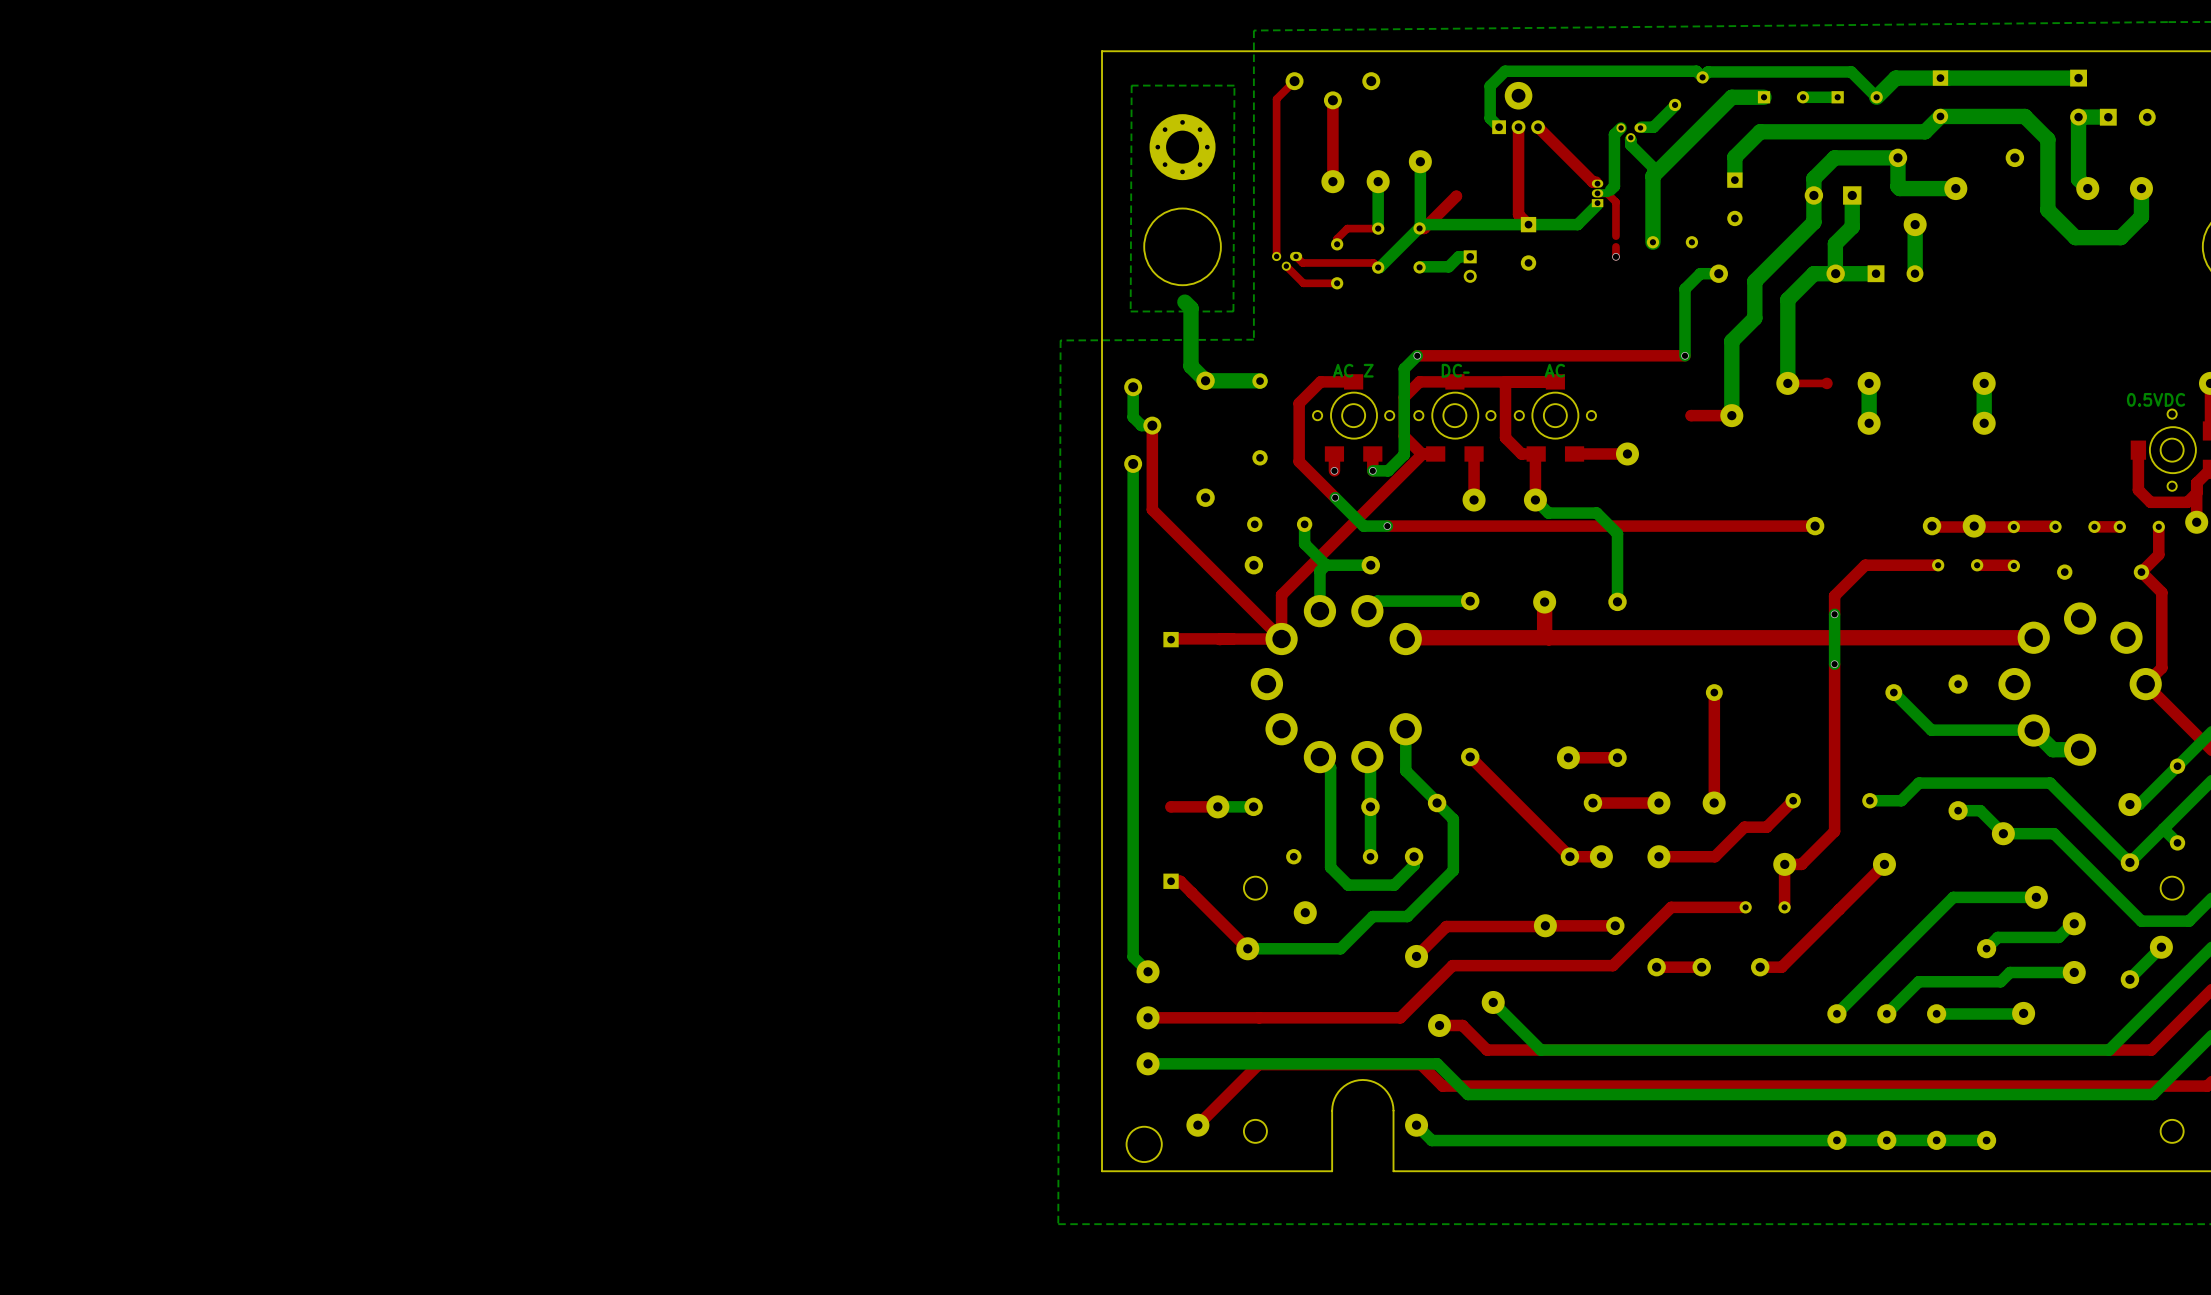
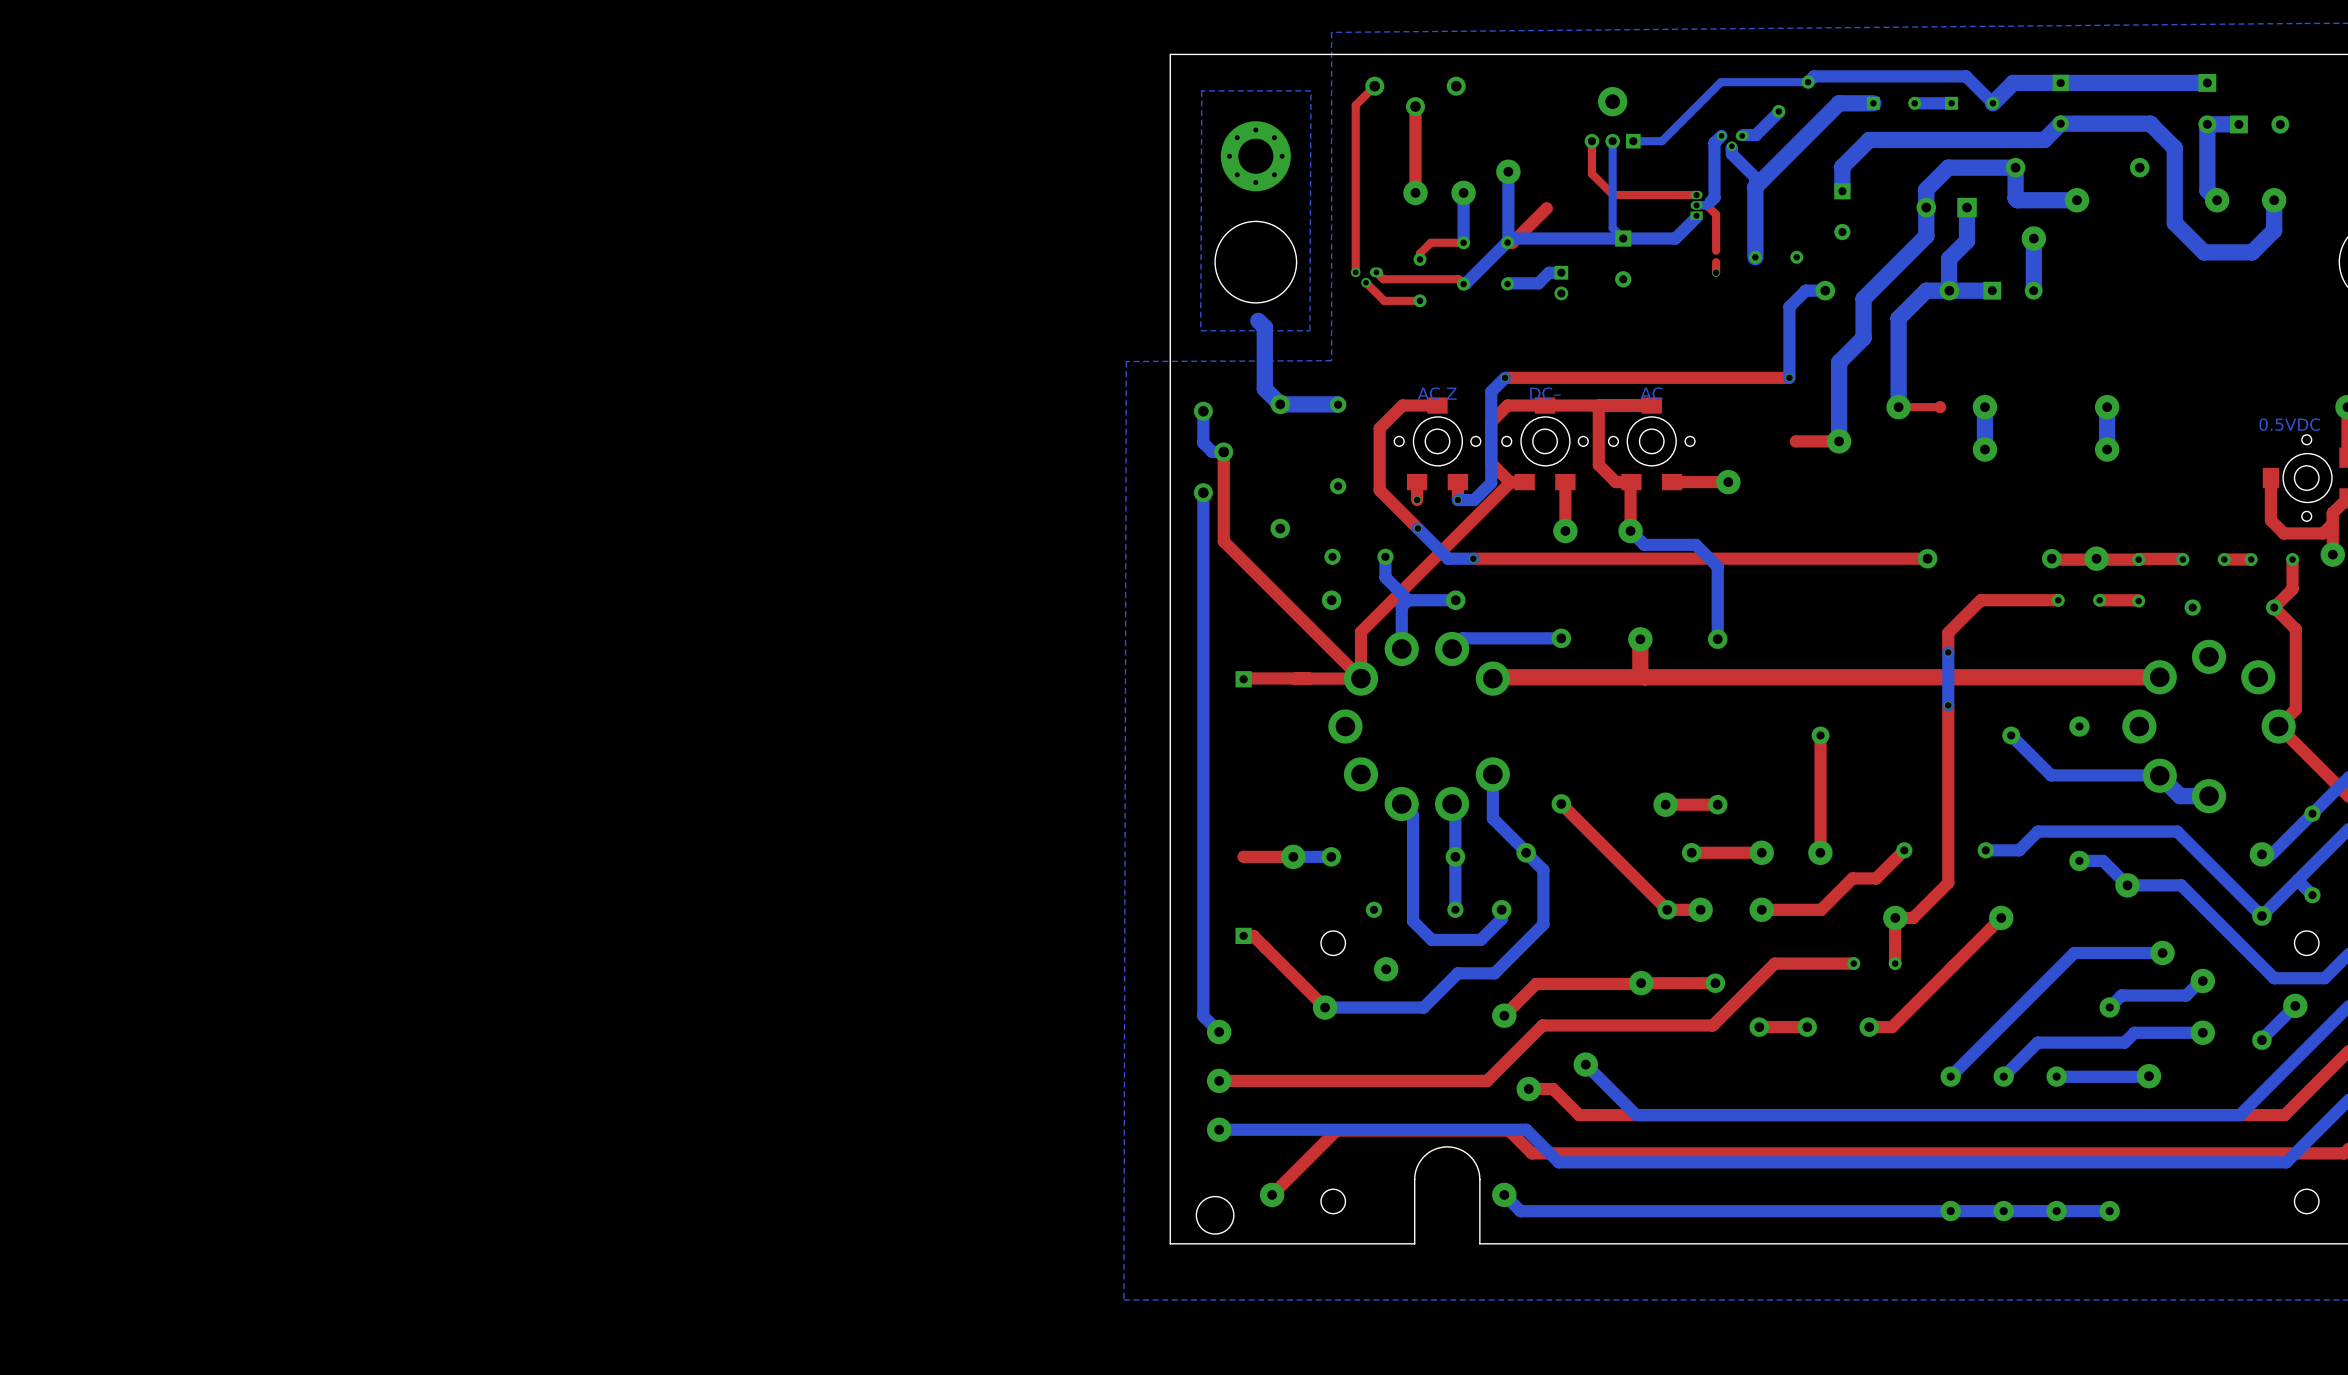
bottom track: (1702, 77) (1696, 71) (1505, 71) (1490, 86) (1490, 118) (1499, 127) -> (1808, 82) (1720, 82) (1661, 141) (1633, 141)
top track: (1518, 127) (1518, 214) (1528, 224) -> none
part rotation: 0° (1518, 127) -> 180° (1612, 141)
top track: (1538, 127) (1592, 182) (1595, 182) -> none
top track: none -> (1591, 141) (1591, 173) (1613, 195) (1696, 195)
bottom track: none -> (1612, 141) (1612, 227) (1623, 238)

